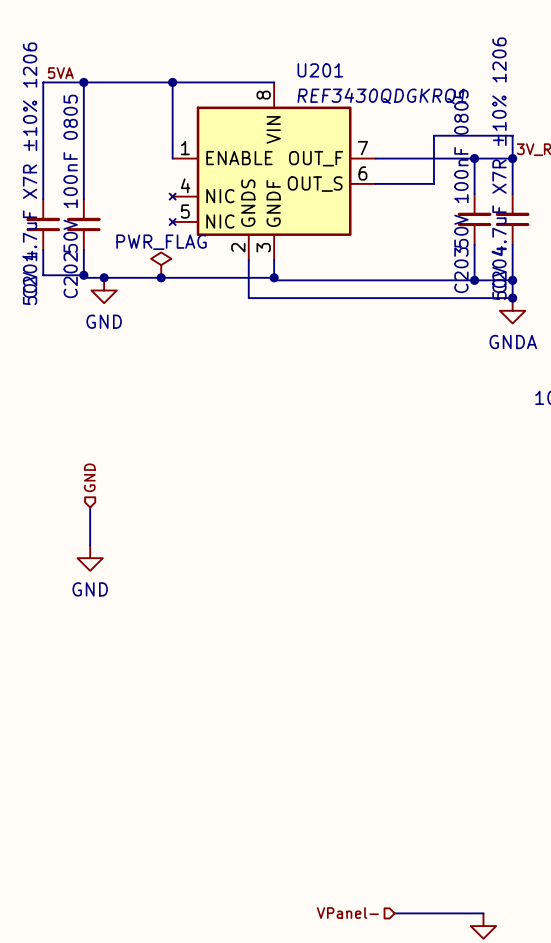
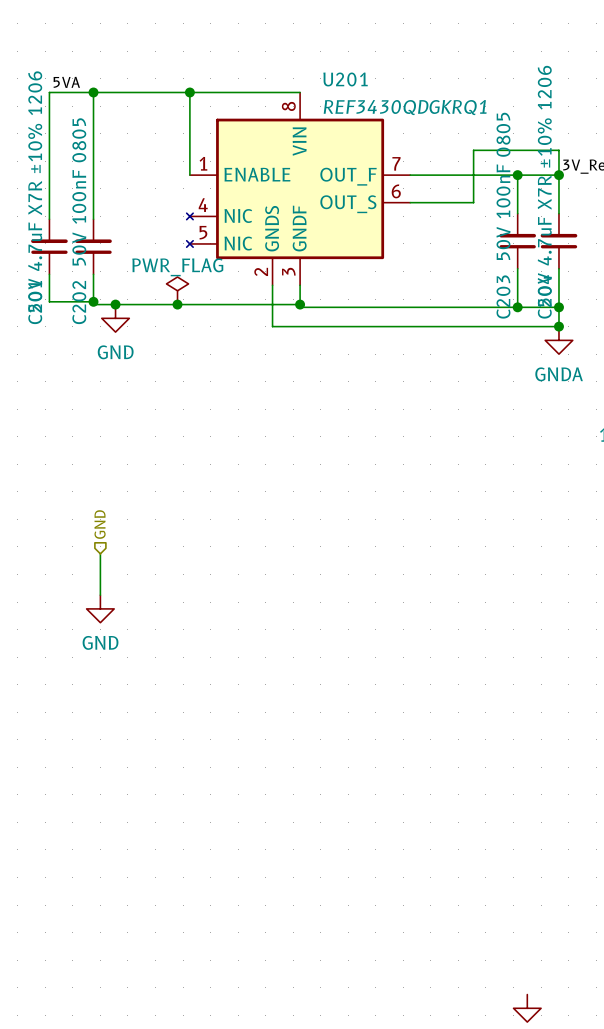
hierarchical label: VPanel- (347, 913) -> none
wire: (394, 913) (483, 913) -> none

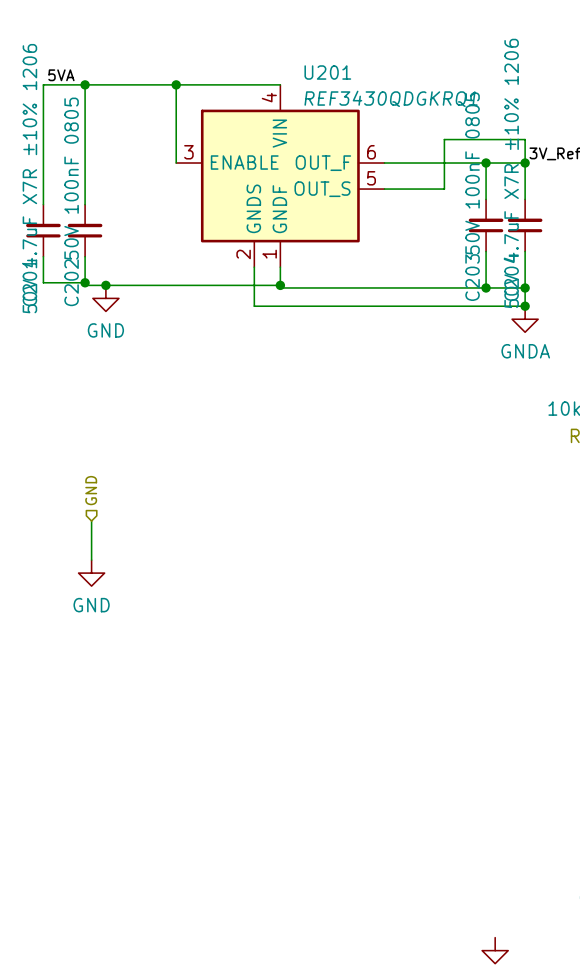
U201 symbol: [186, 92, 411, 286] -> [176, 84, 385, 268]
power symbol: PWR_FLAG (177, 290) -> none
junction: (177, 304) -> none

